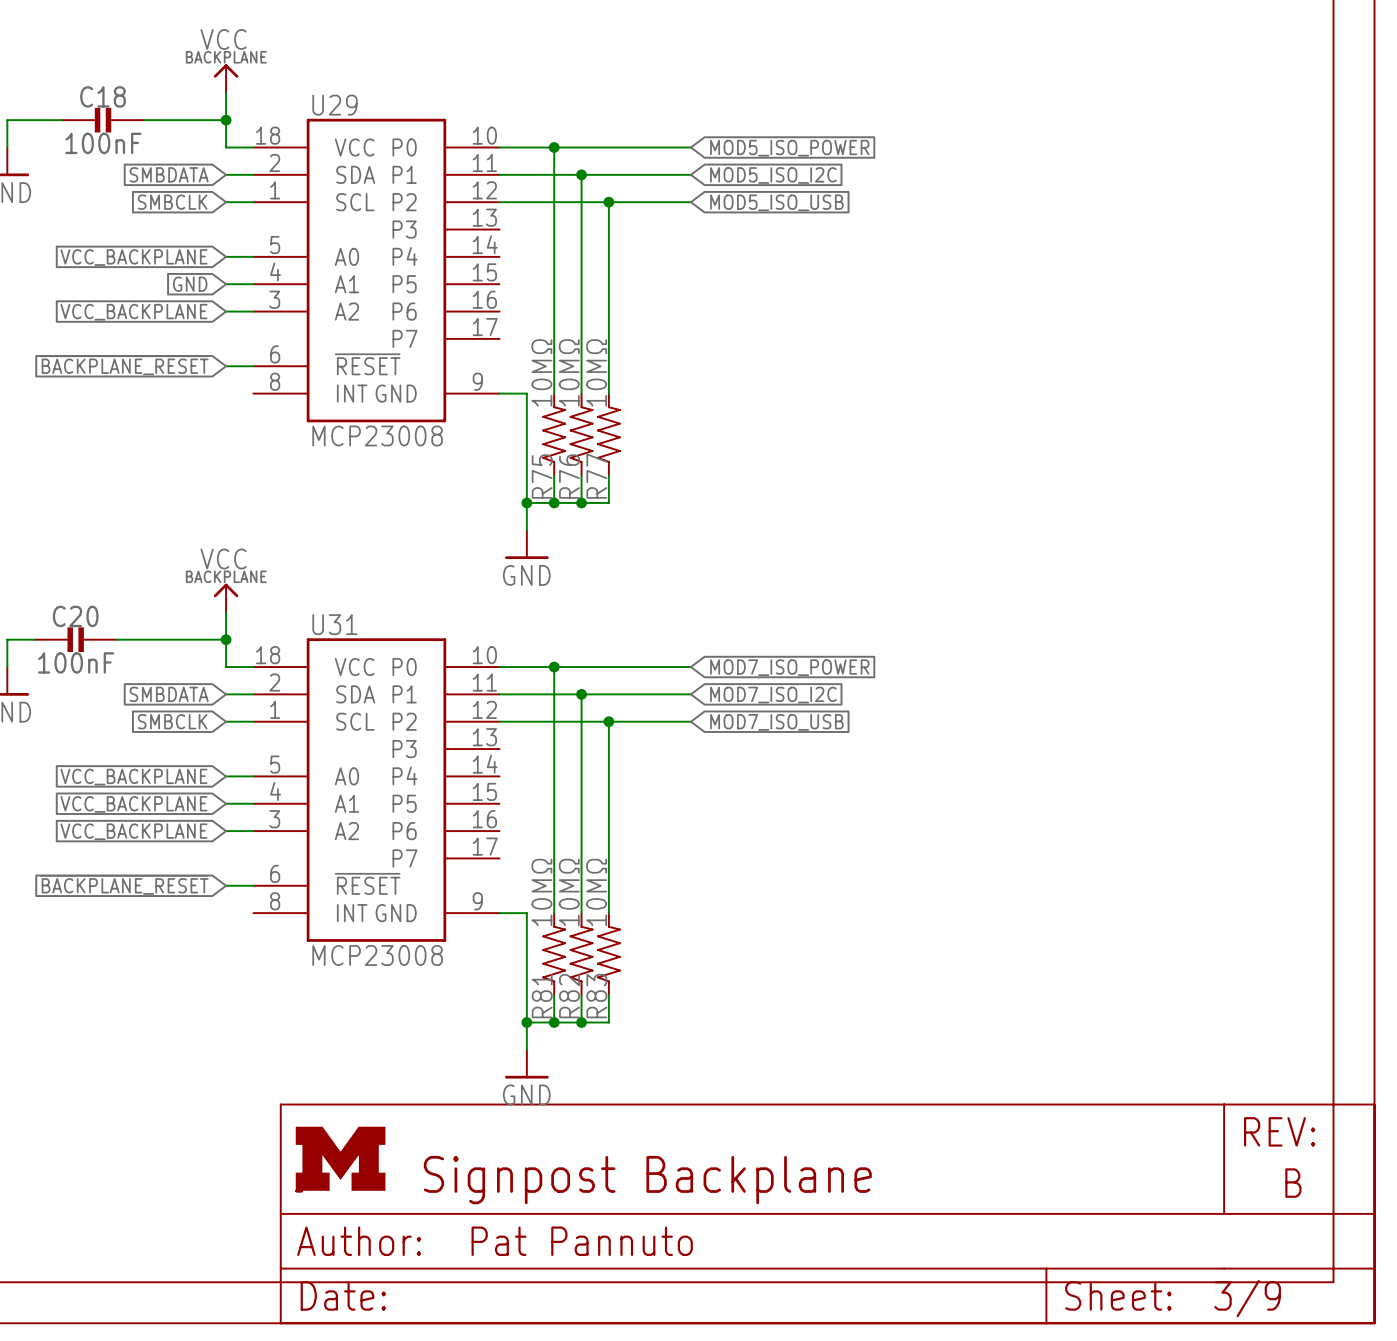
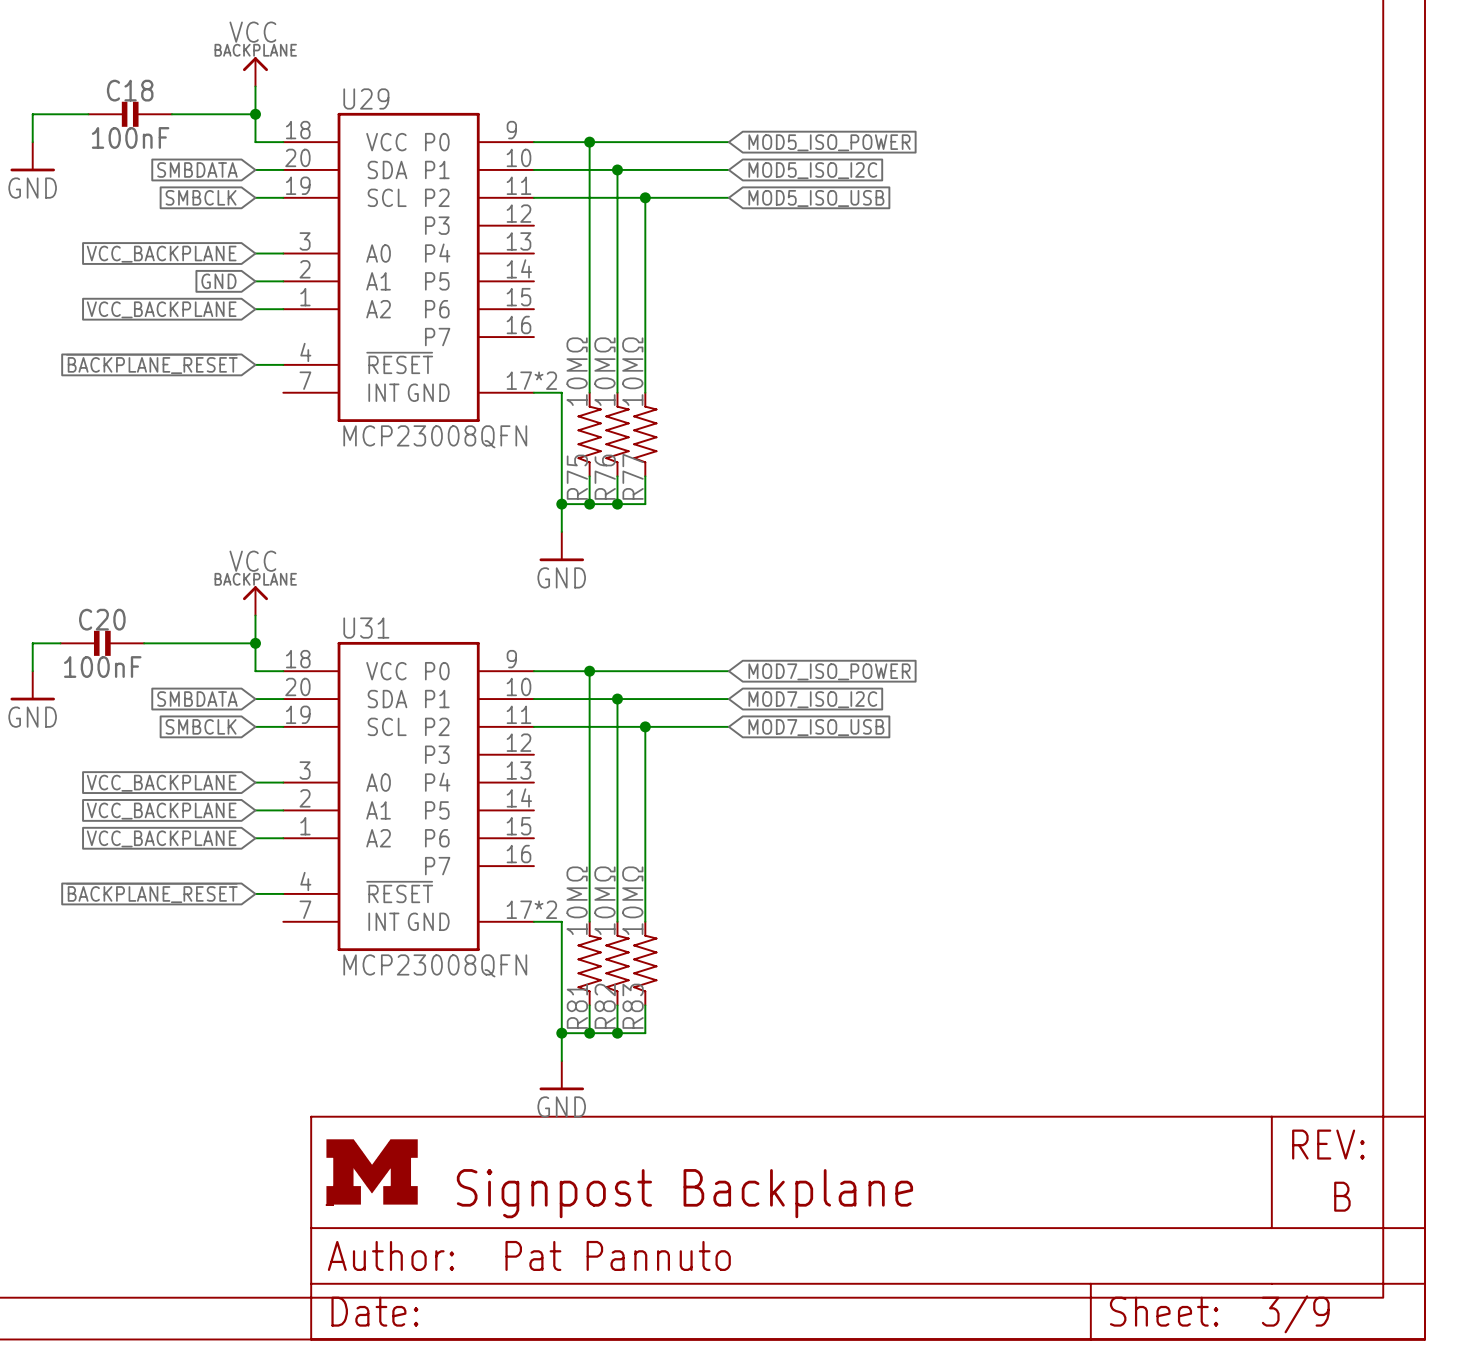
U29 symbol: [253, 118, 500, 423] -> [283, 112, 534, 422]
U29 value: MCP23008 (377, 435) -> MCP23008QFN (435, 436)
U31 symbol: [253, 638, 500, 942] -> [283, 641, 534, 952]
U31 value: MCP23008 (377, 955) -> MCP23008QFN (435, 965)

